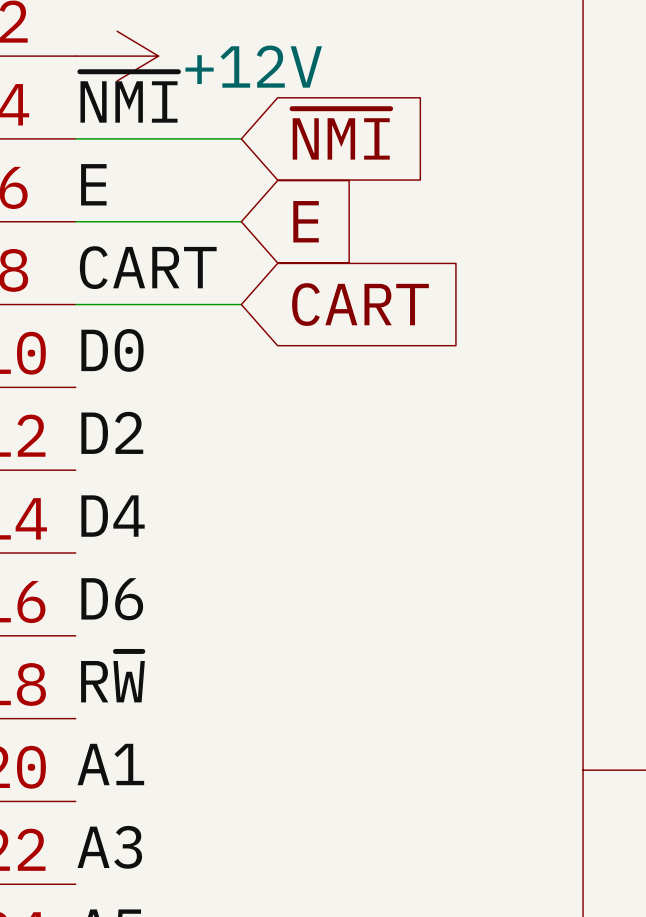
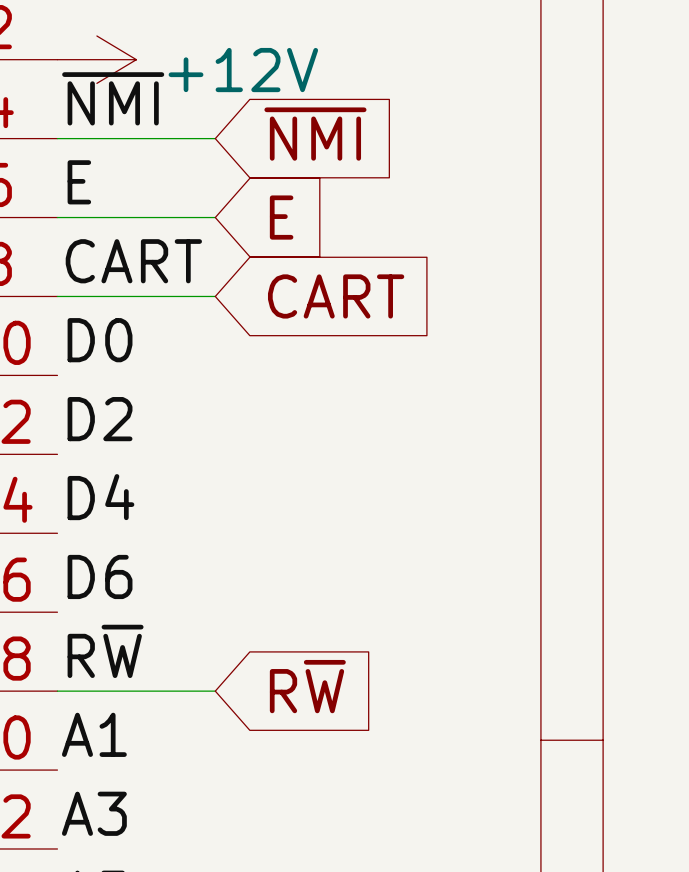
global label: none -> R~{W} (307, 686)
wire: none -> (57, 691) (215, 691)

